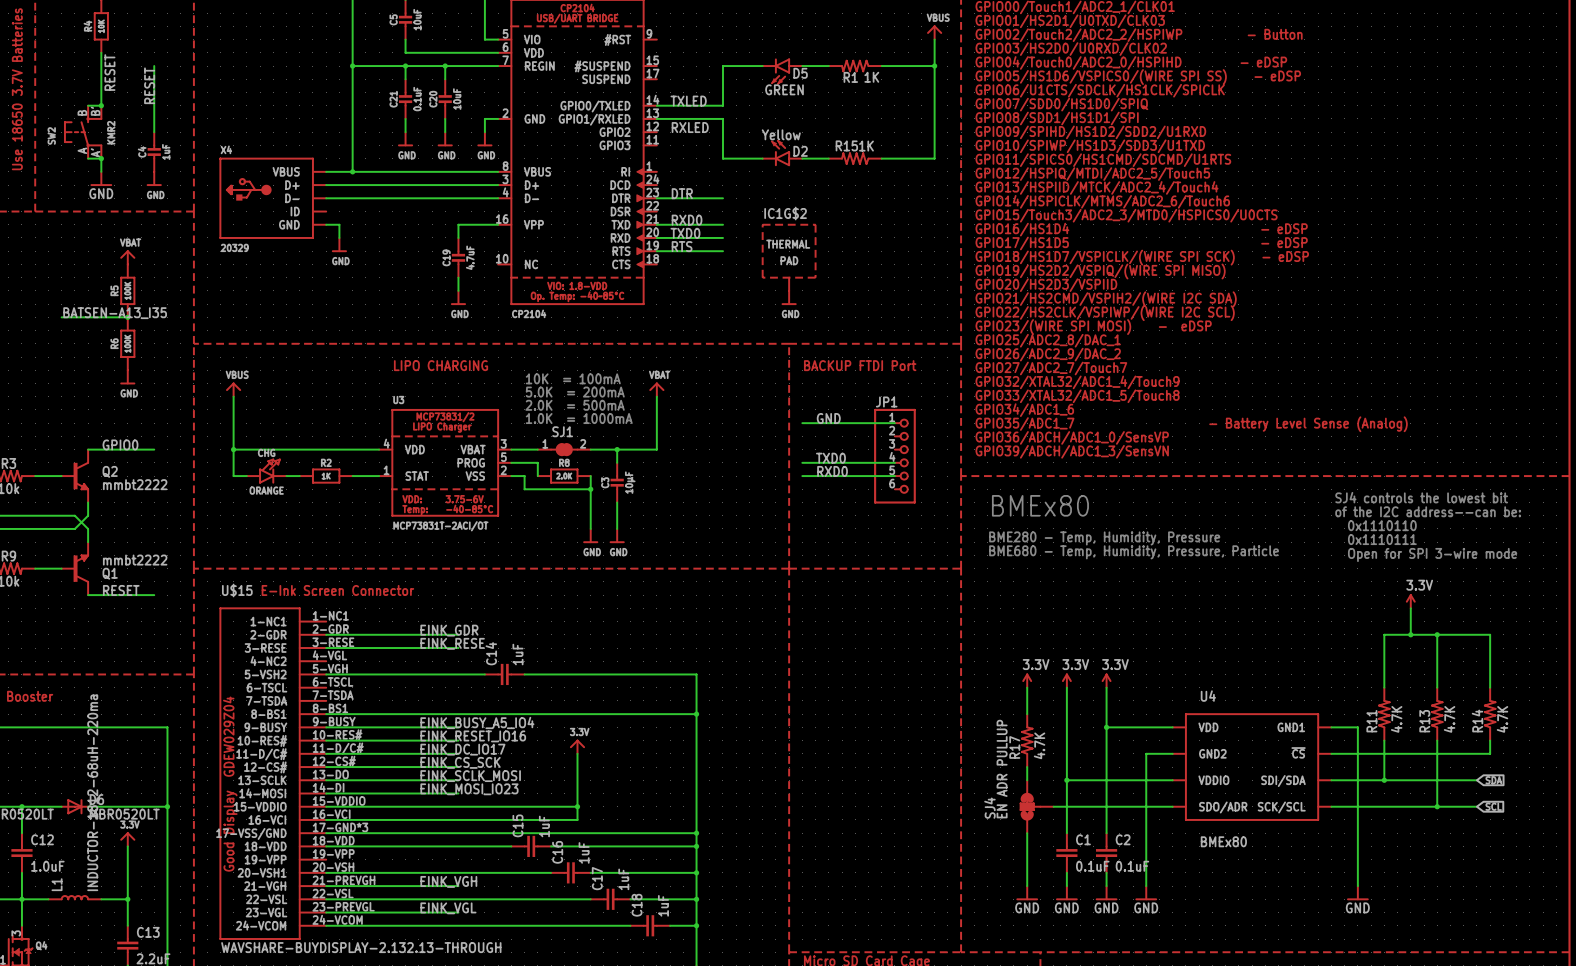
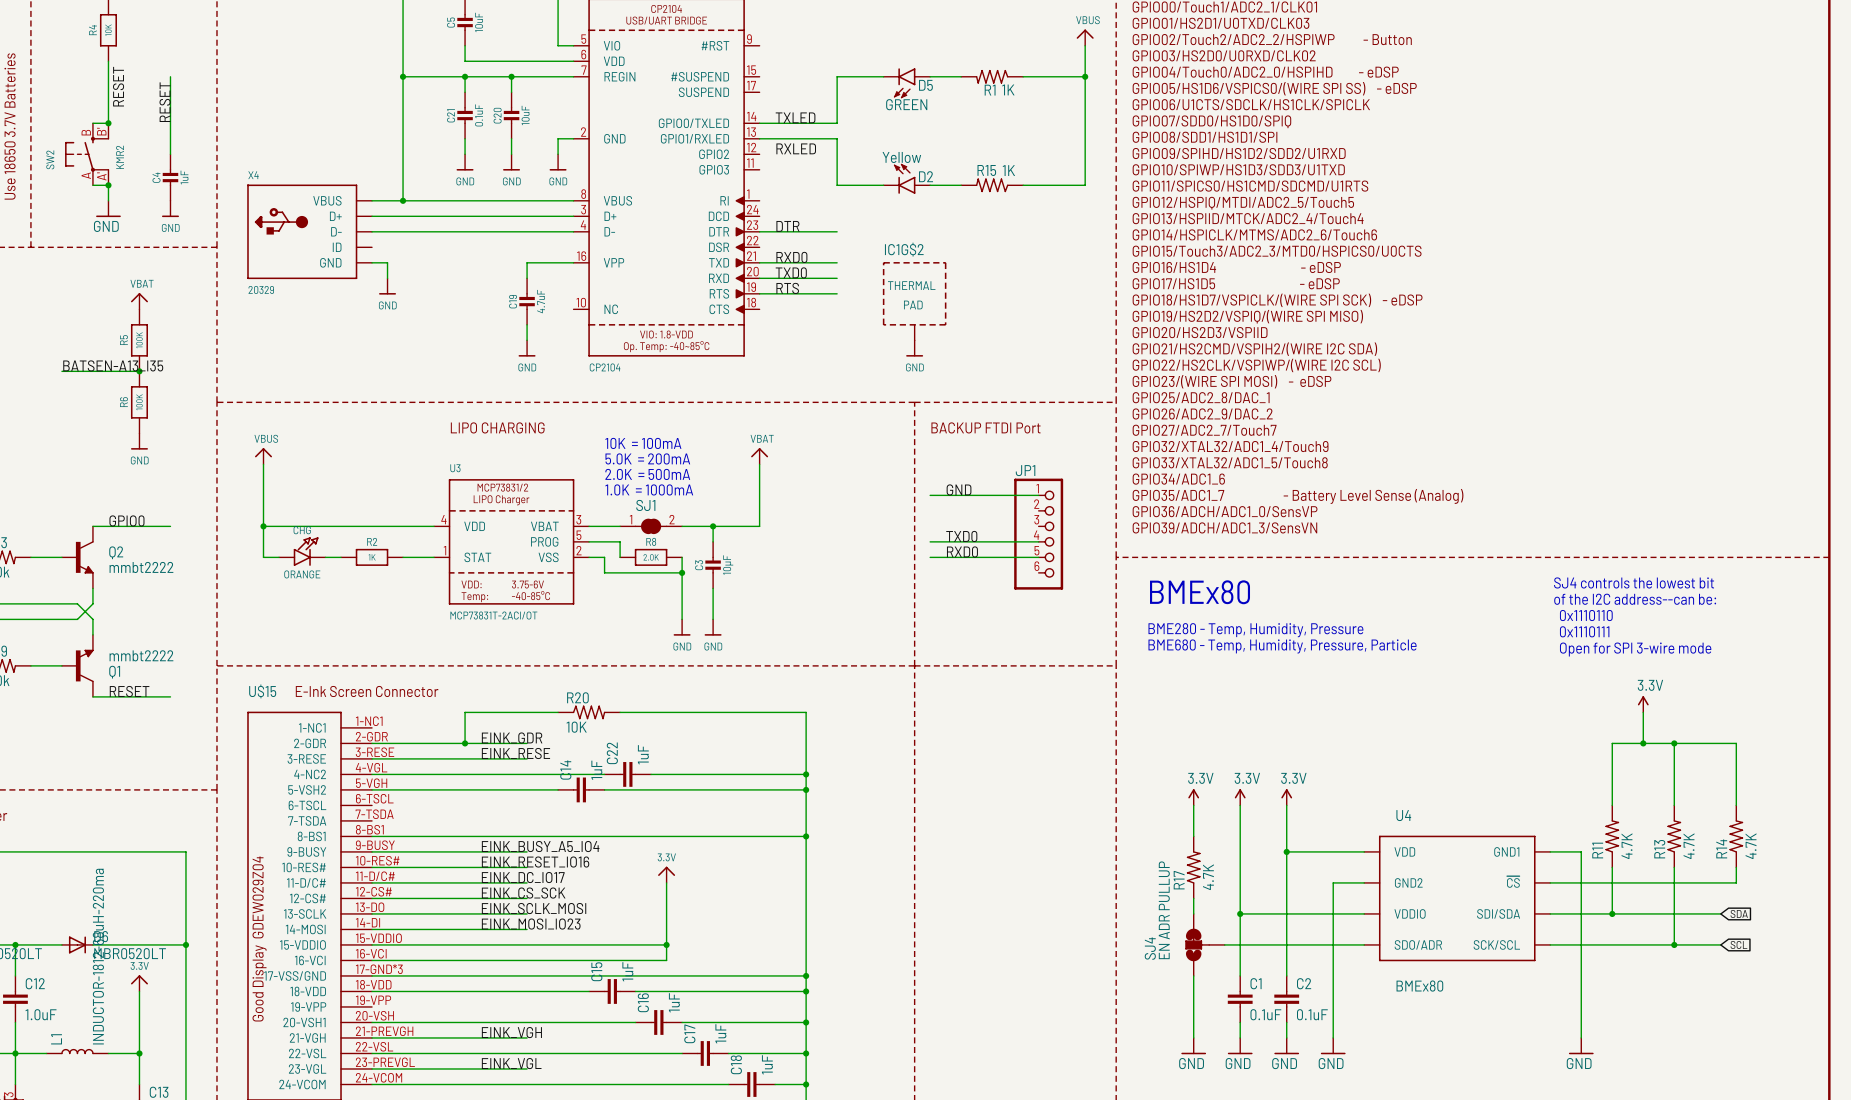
wire: none -> (558, 712) (465, 712) (465, 743)
R20: none -> 10K (589, 712)
wire: none -> (620, 712) (806, 712) (806, 789)
junction: none -> (465, 743)
wire: none -> (372, 774) (604, 774)
C22: none -> 1uF (627, 774)
wire: none -> (651, 774) (806, 774)
junction: none -> (806, 774)
junction: none -> (806, 789)

